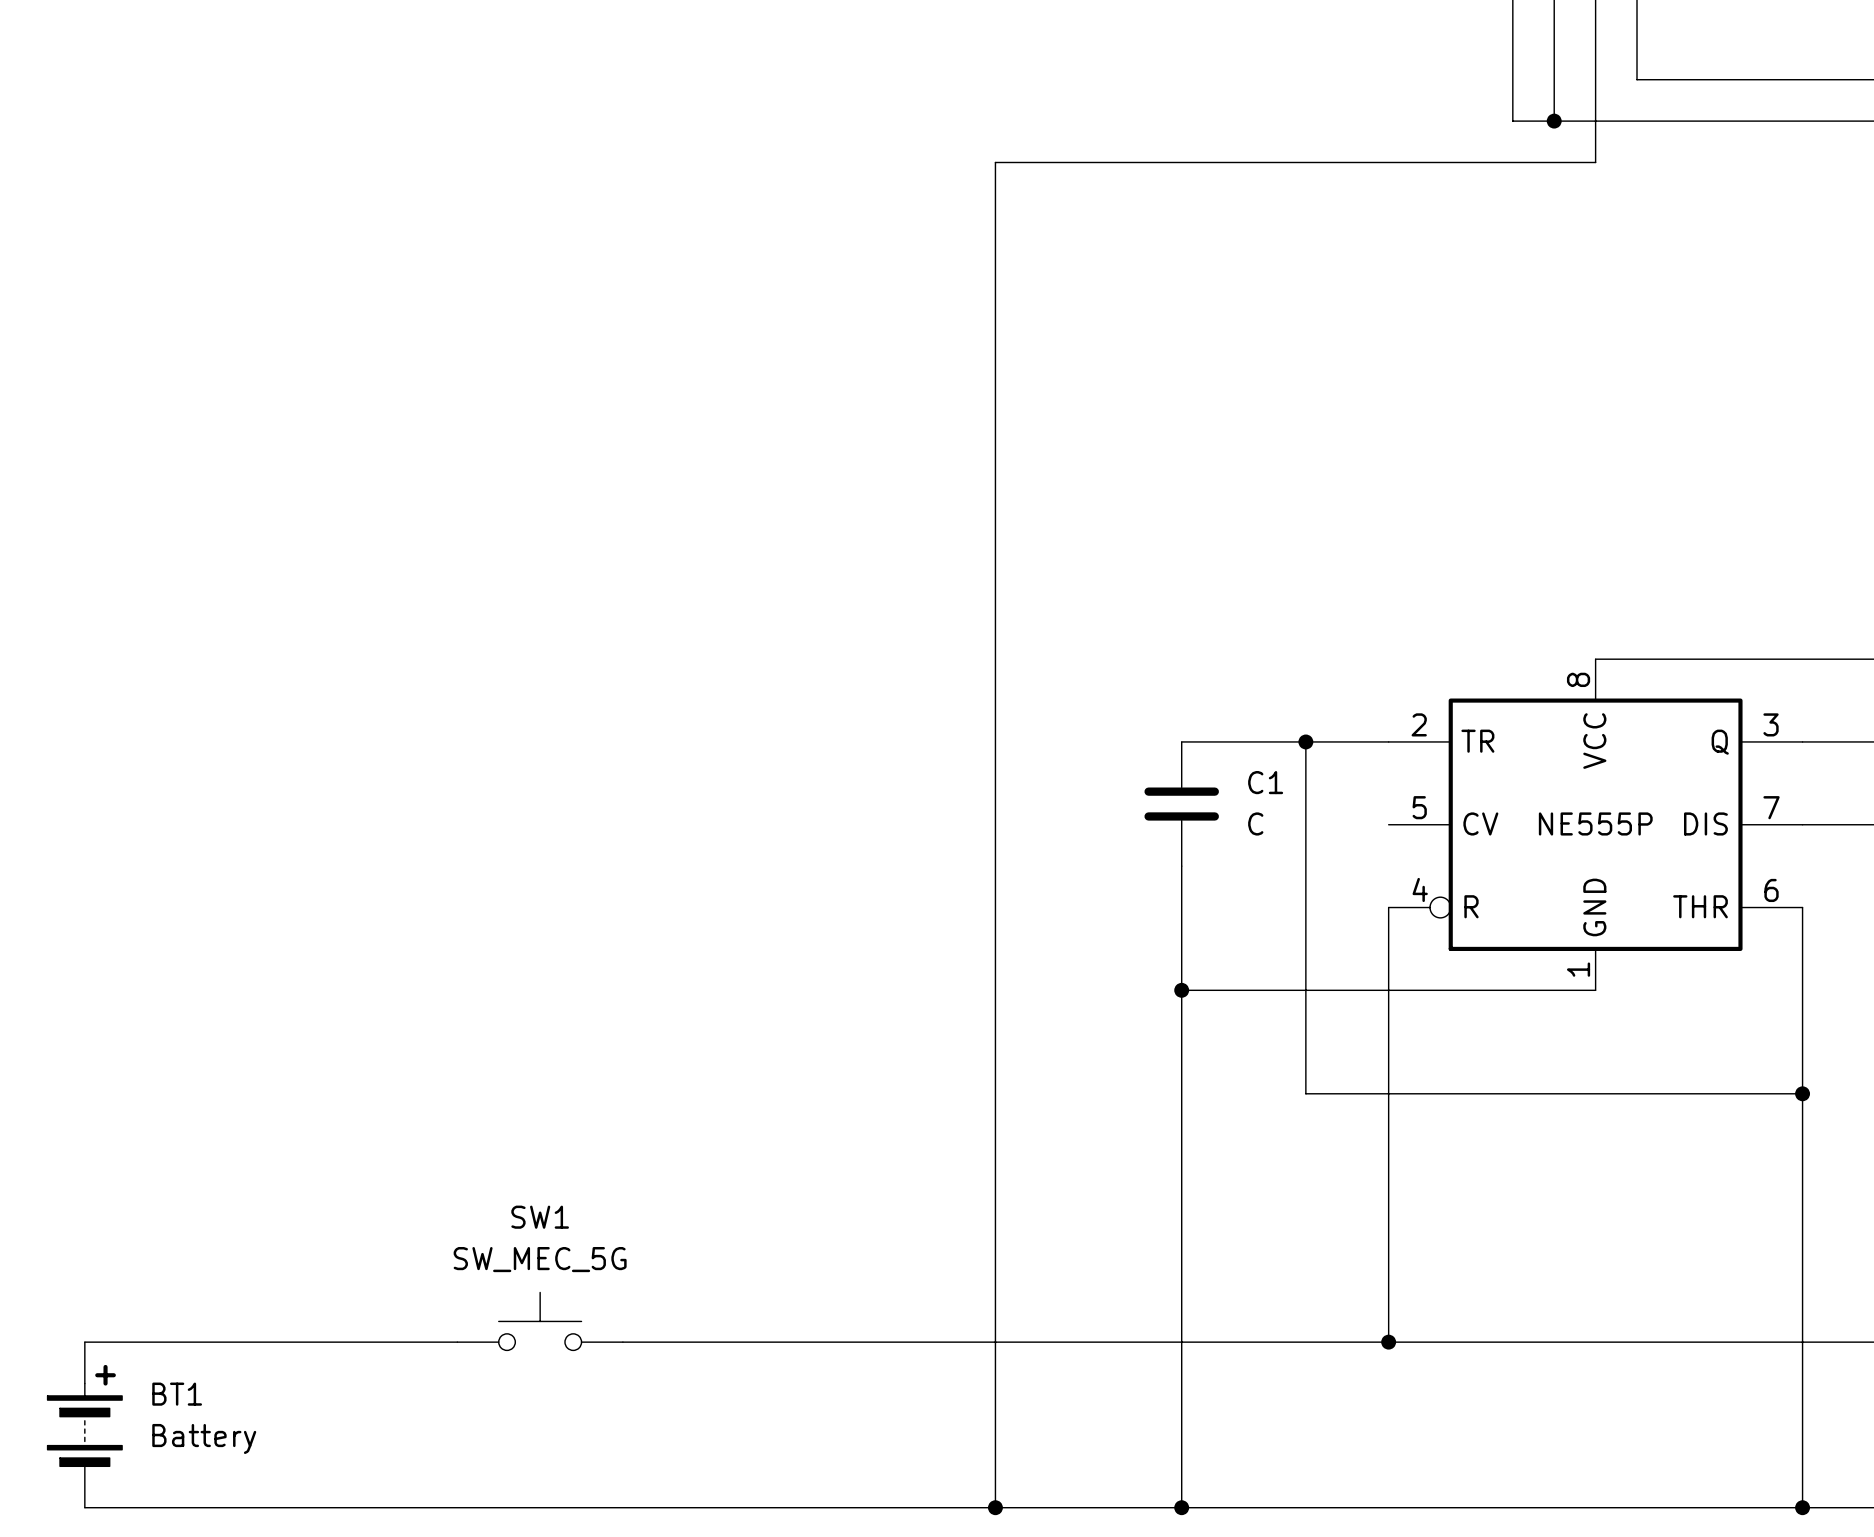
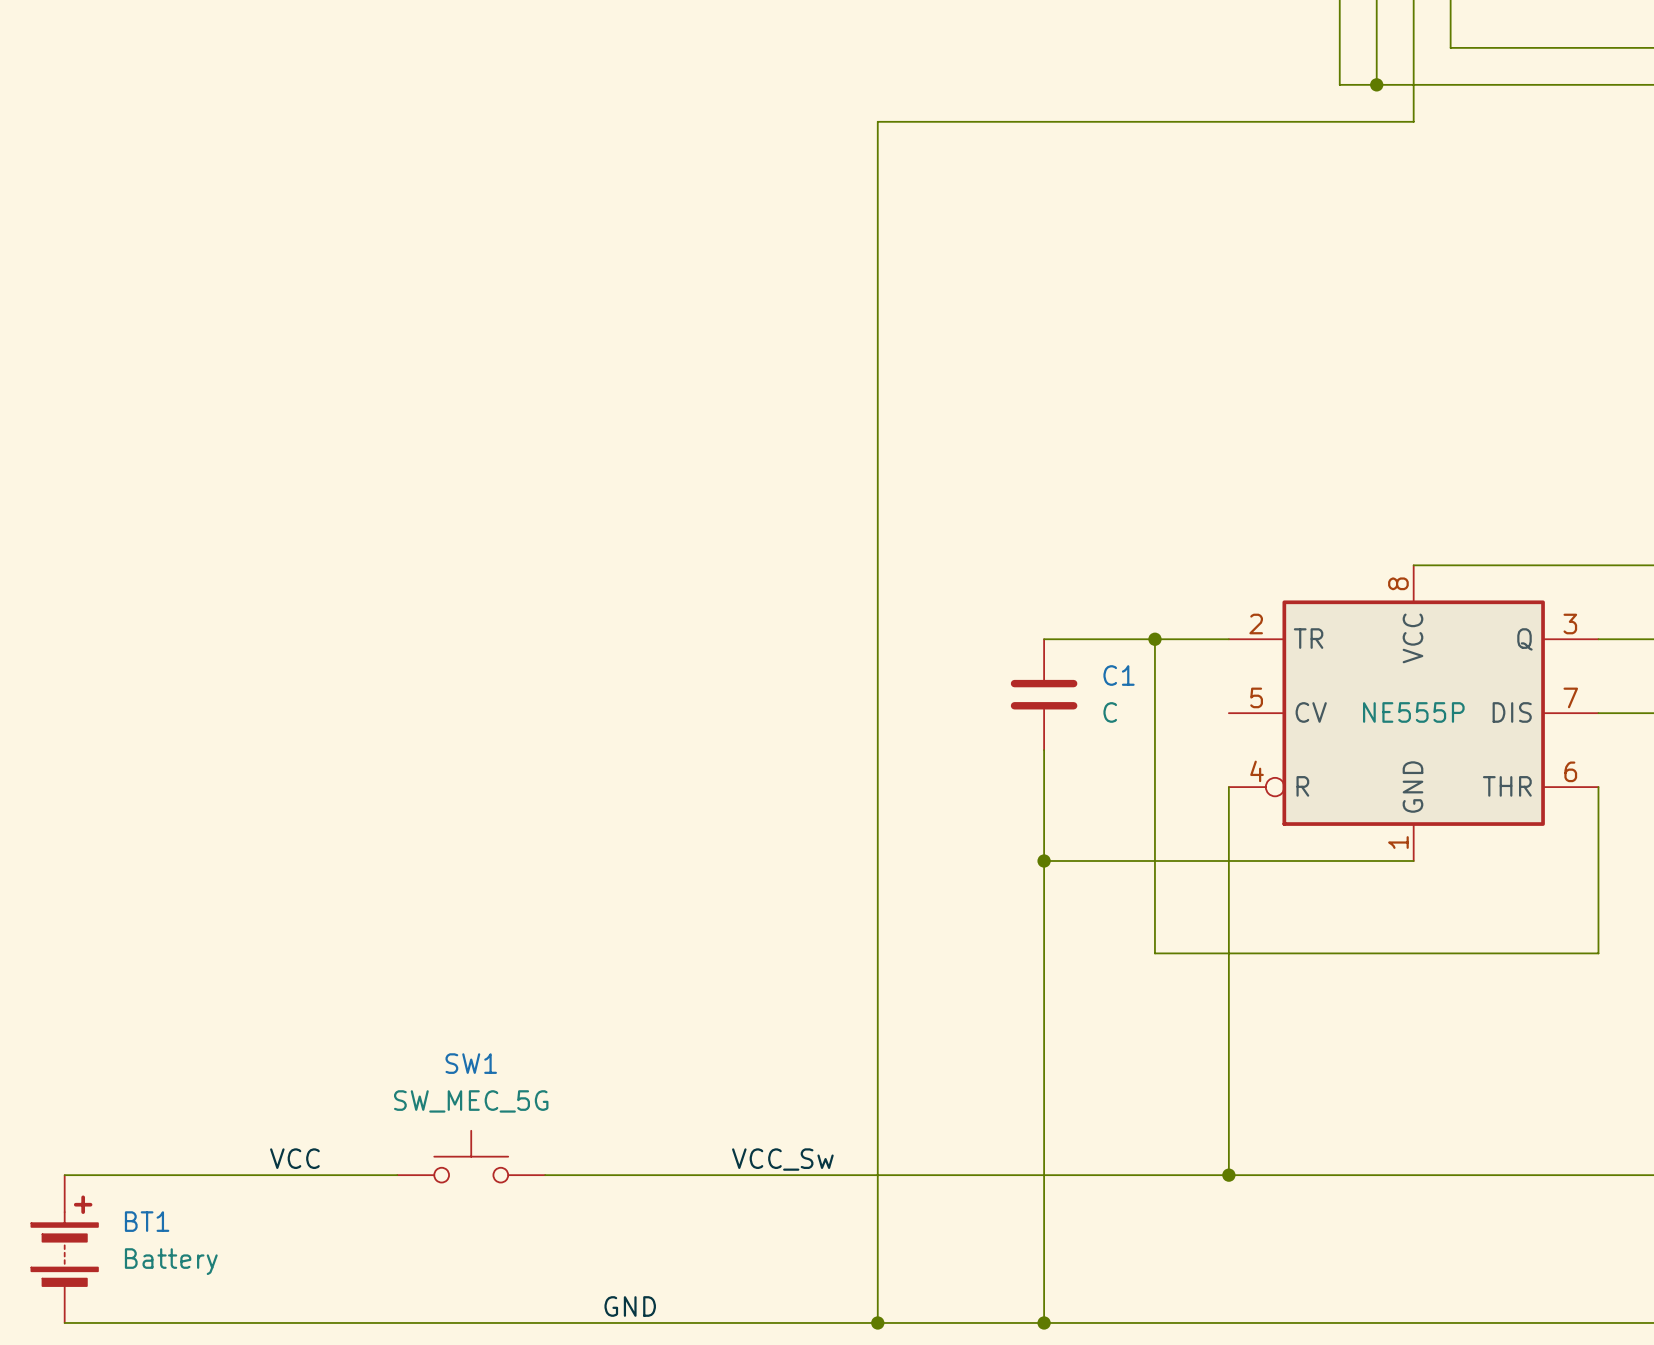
wire: (1802, 1093) (1802, 1507) -> none
junction: (1802, 1093) -> none
label: none -> VCC (294, 1158)
label: none -> VCC_Sw (782, 1159)
label: none -> GND (630, 1306)
junction: (1802, 1507) -> none

